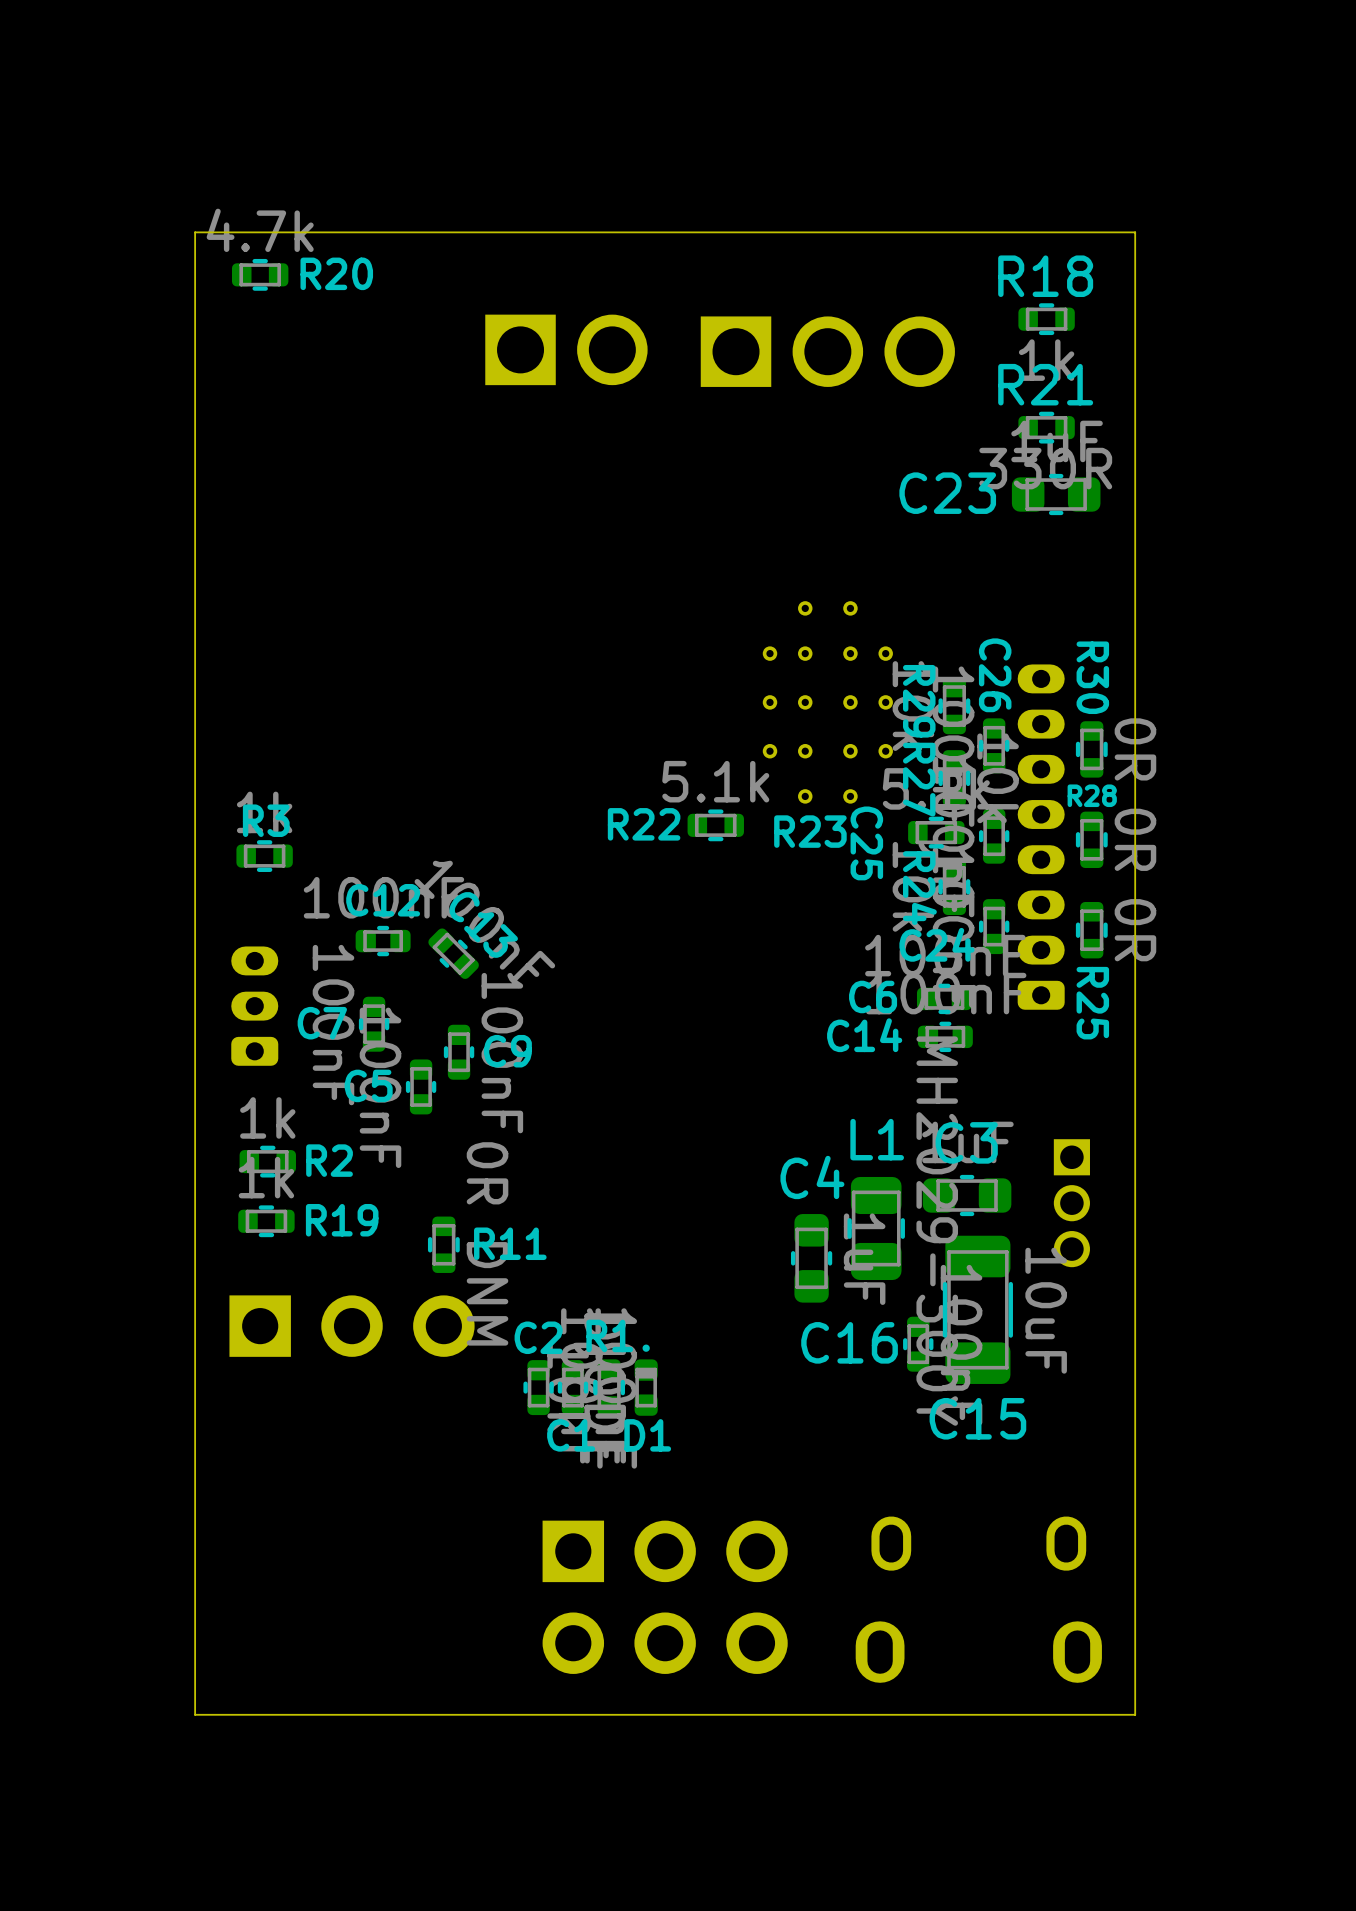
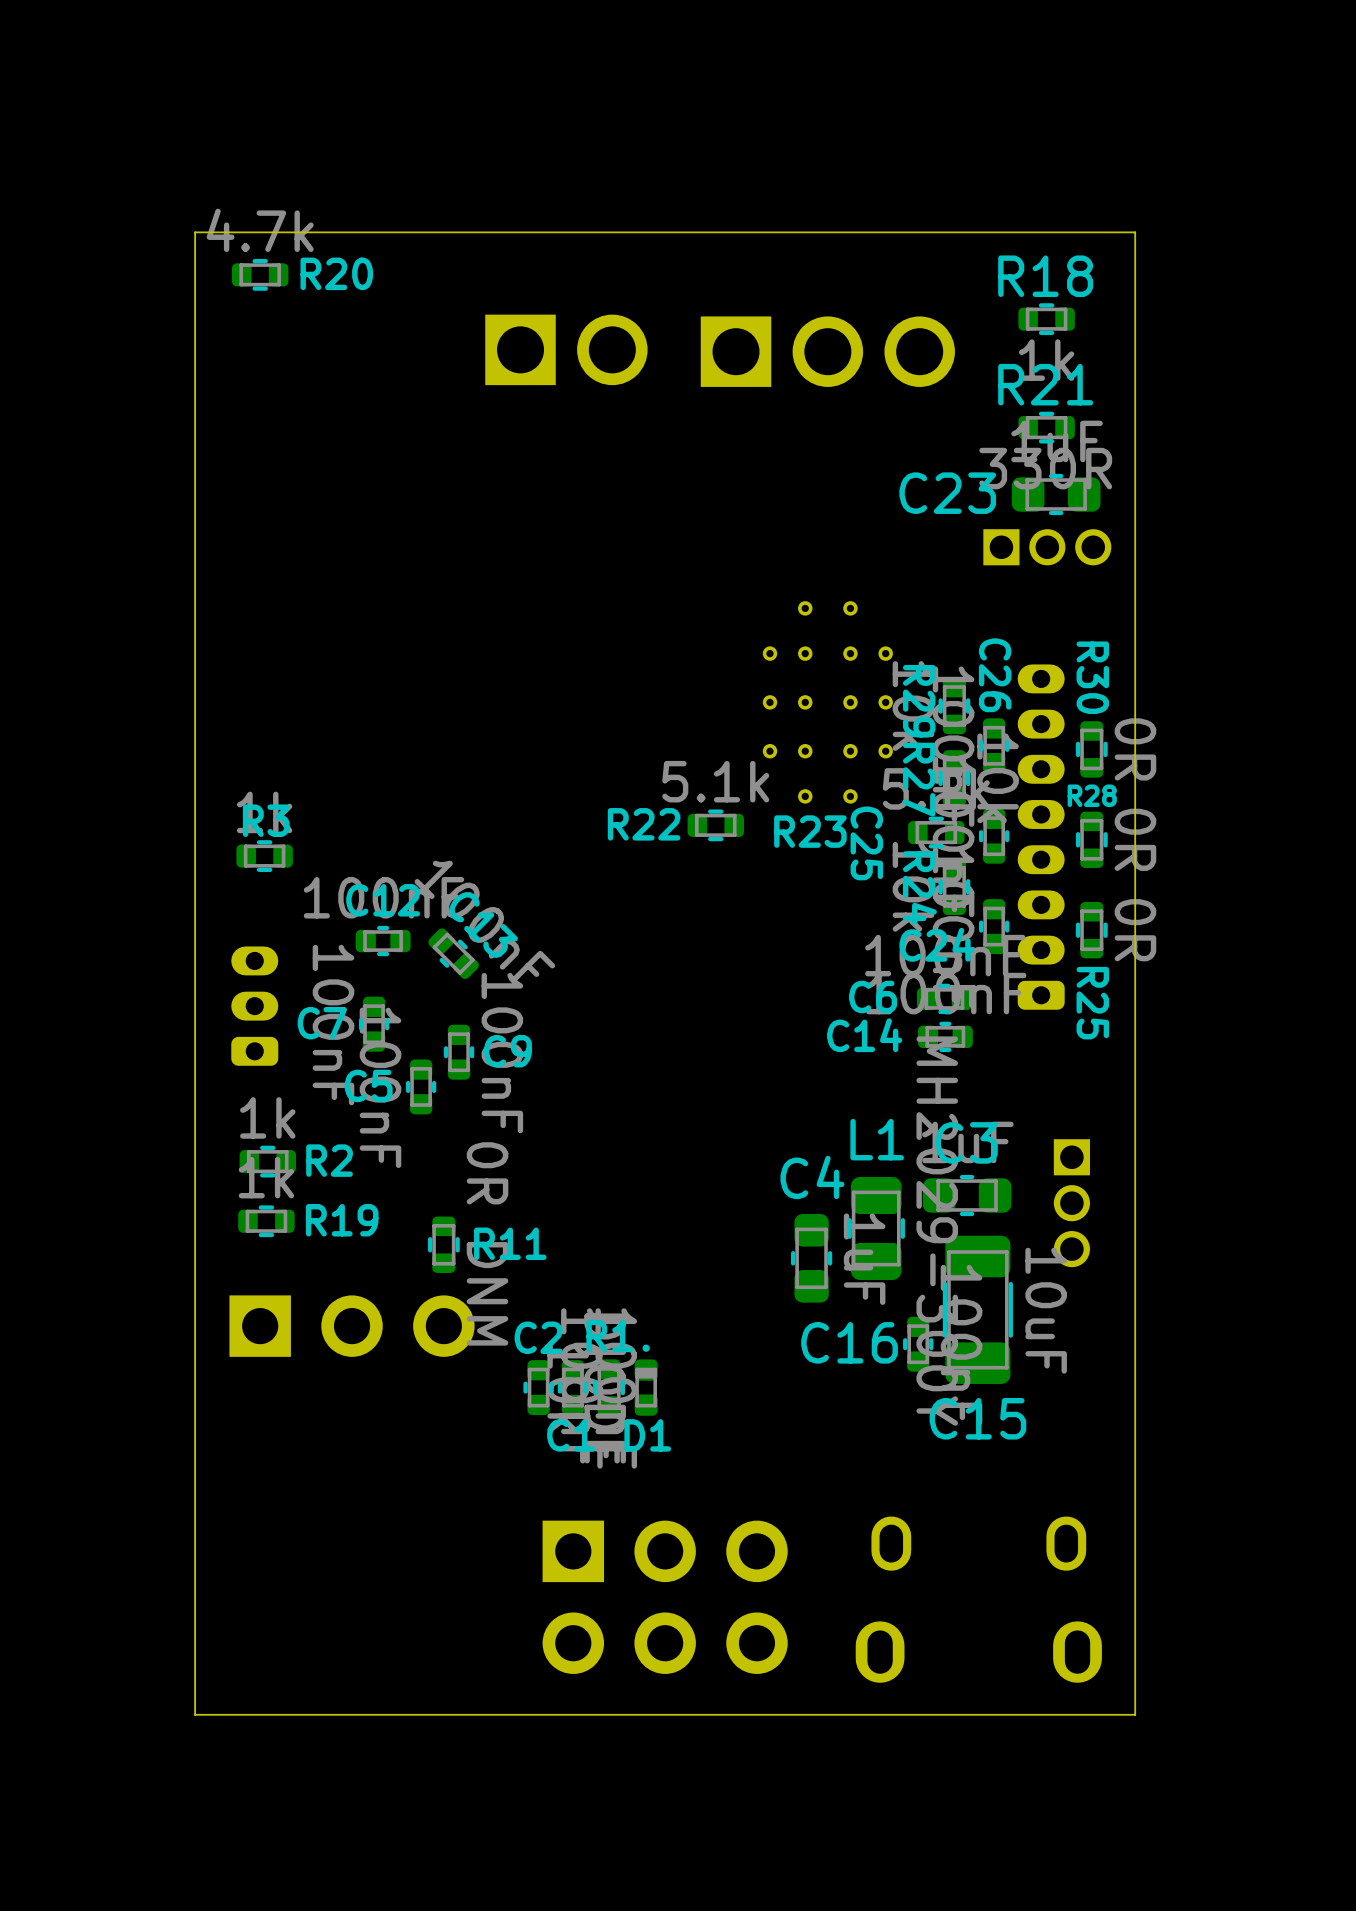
part: none -> (1047, 547)

